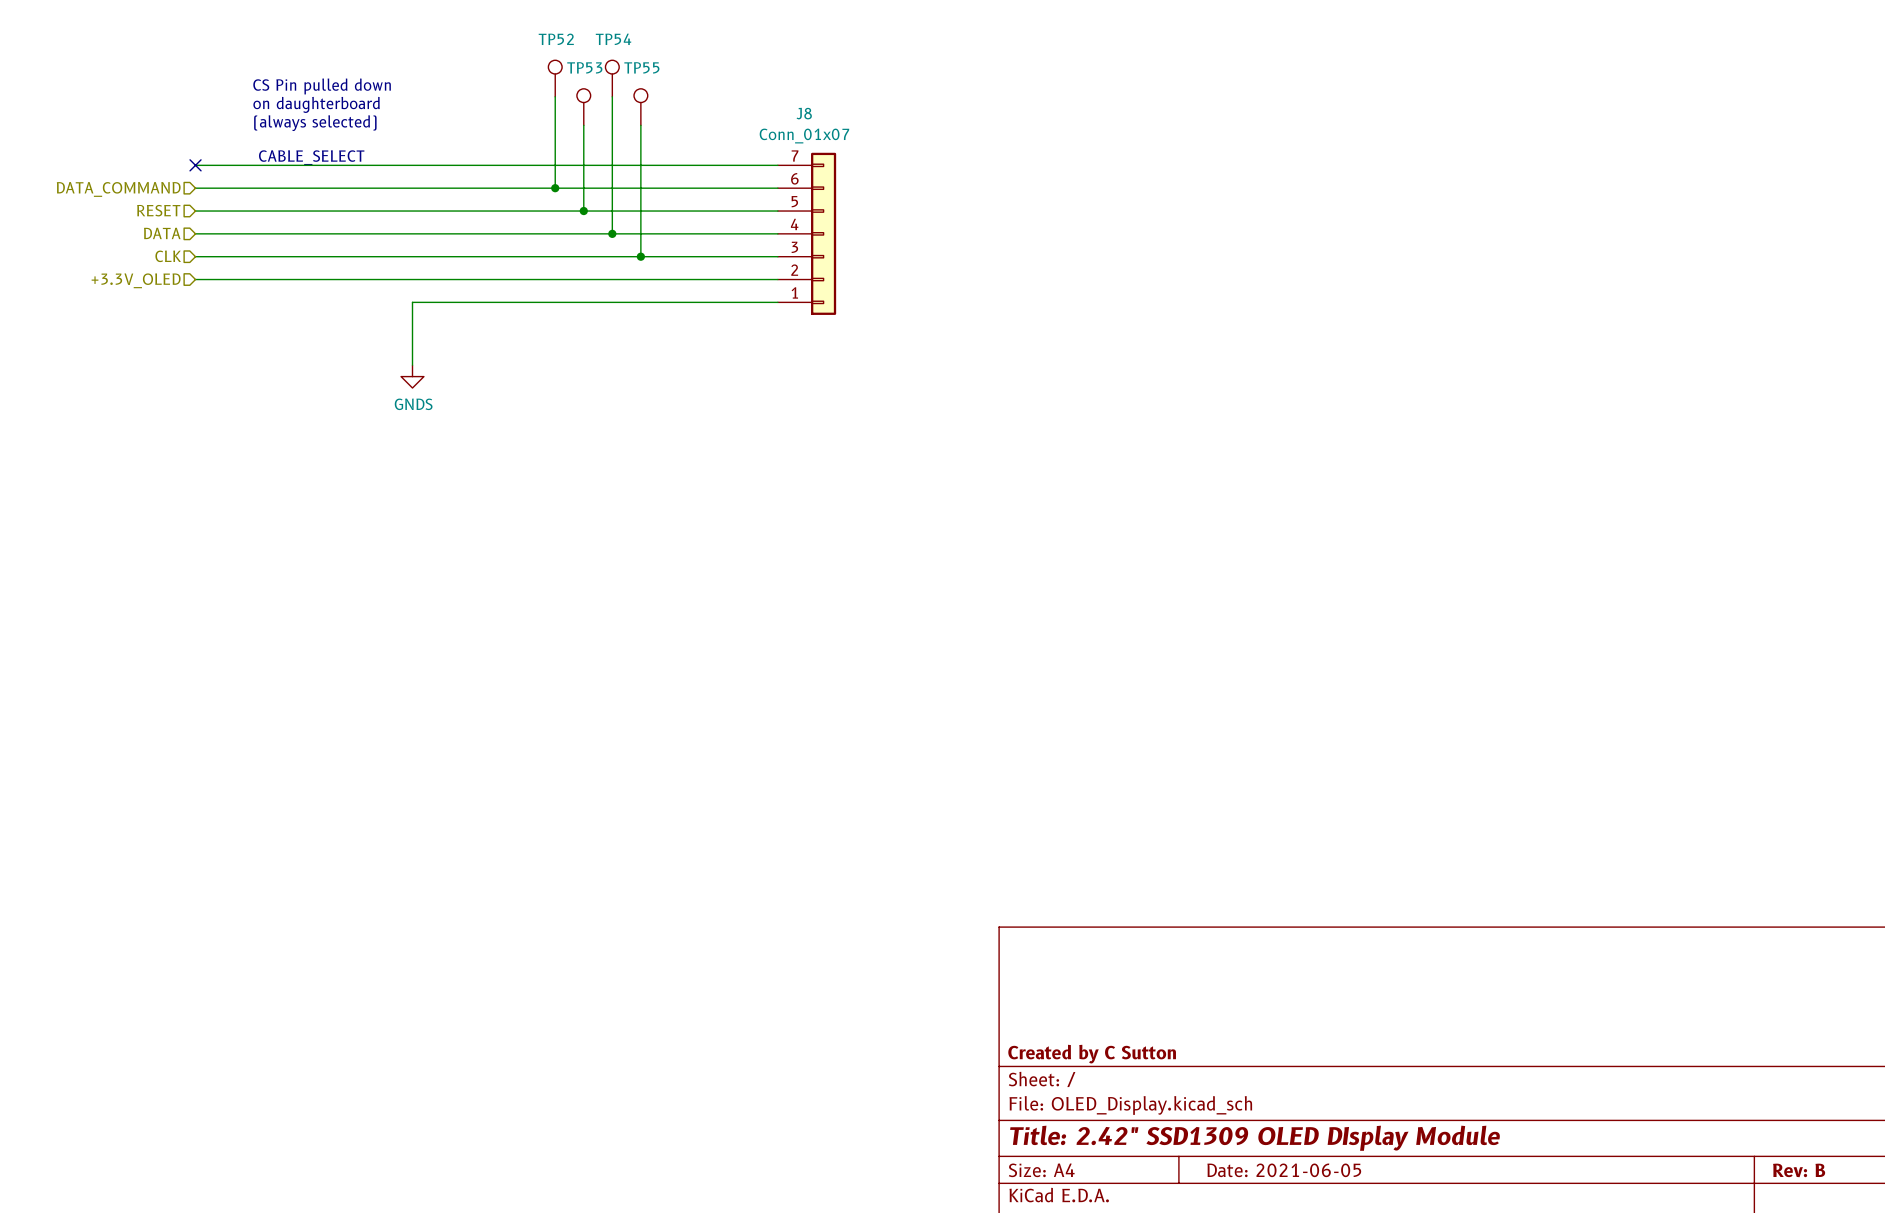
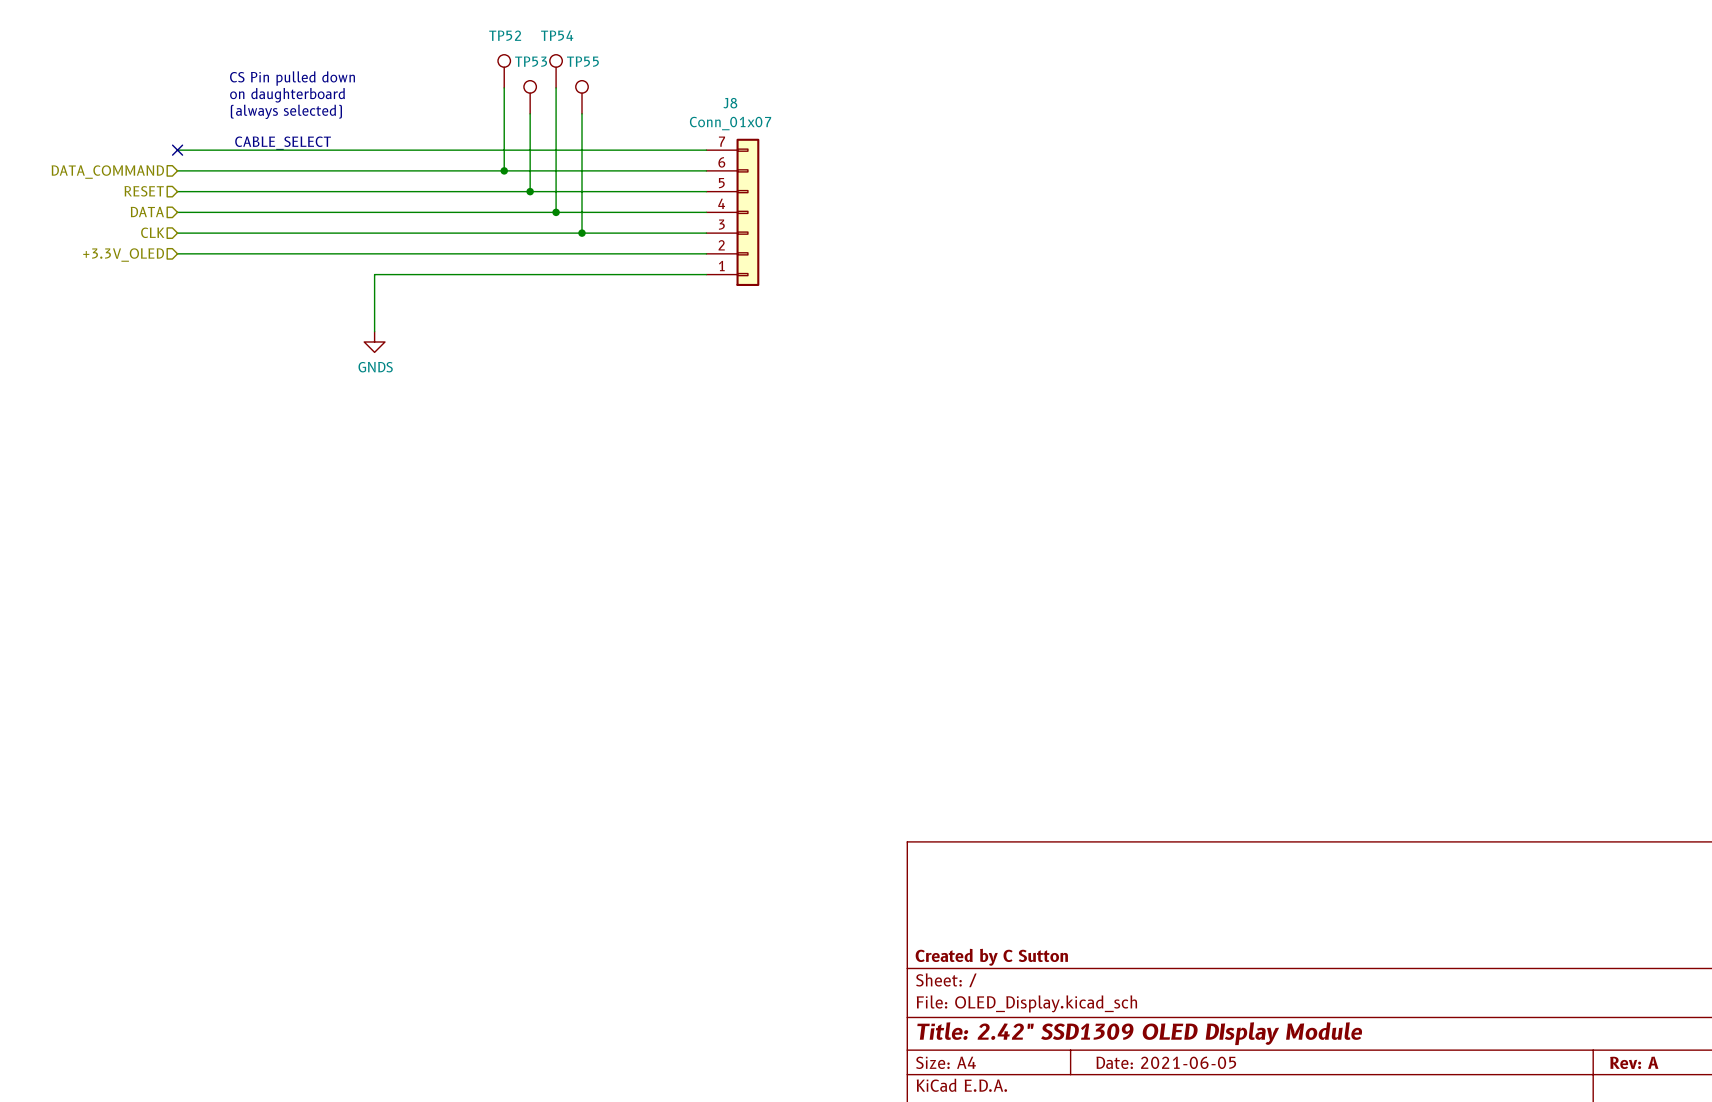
title block: Rev: B (1799, 1170) -> Rev: A (1634, 1062)

